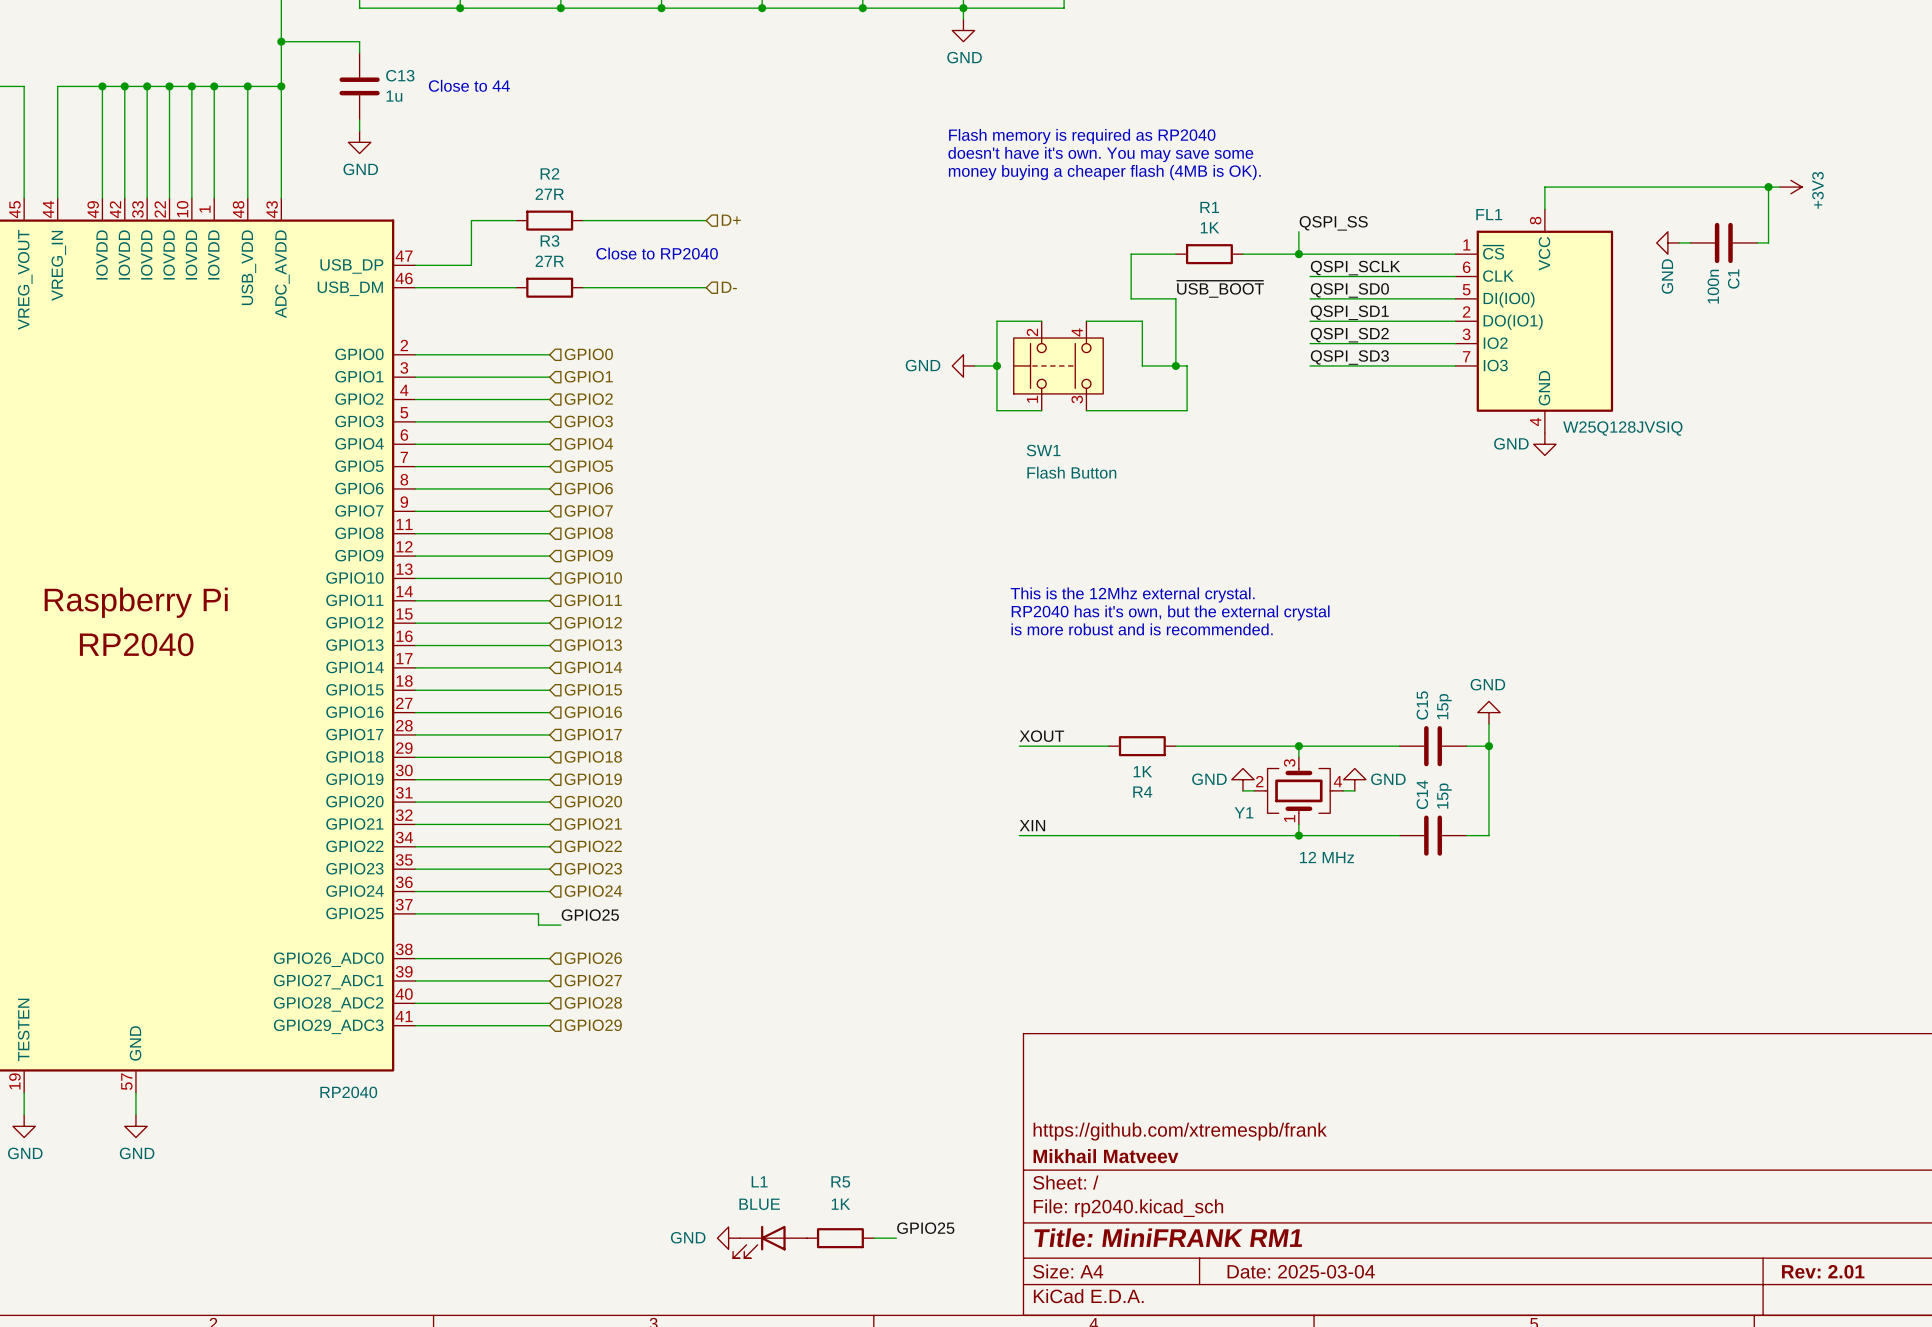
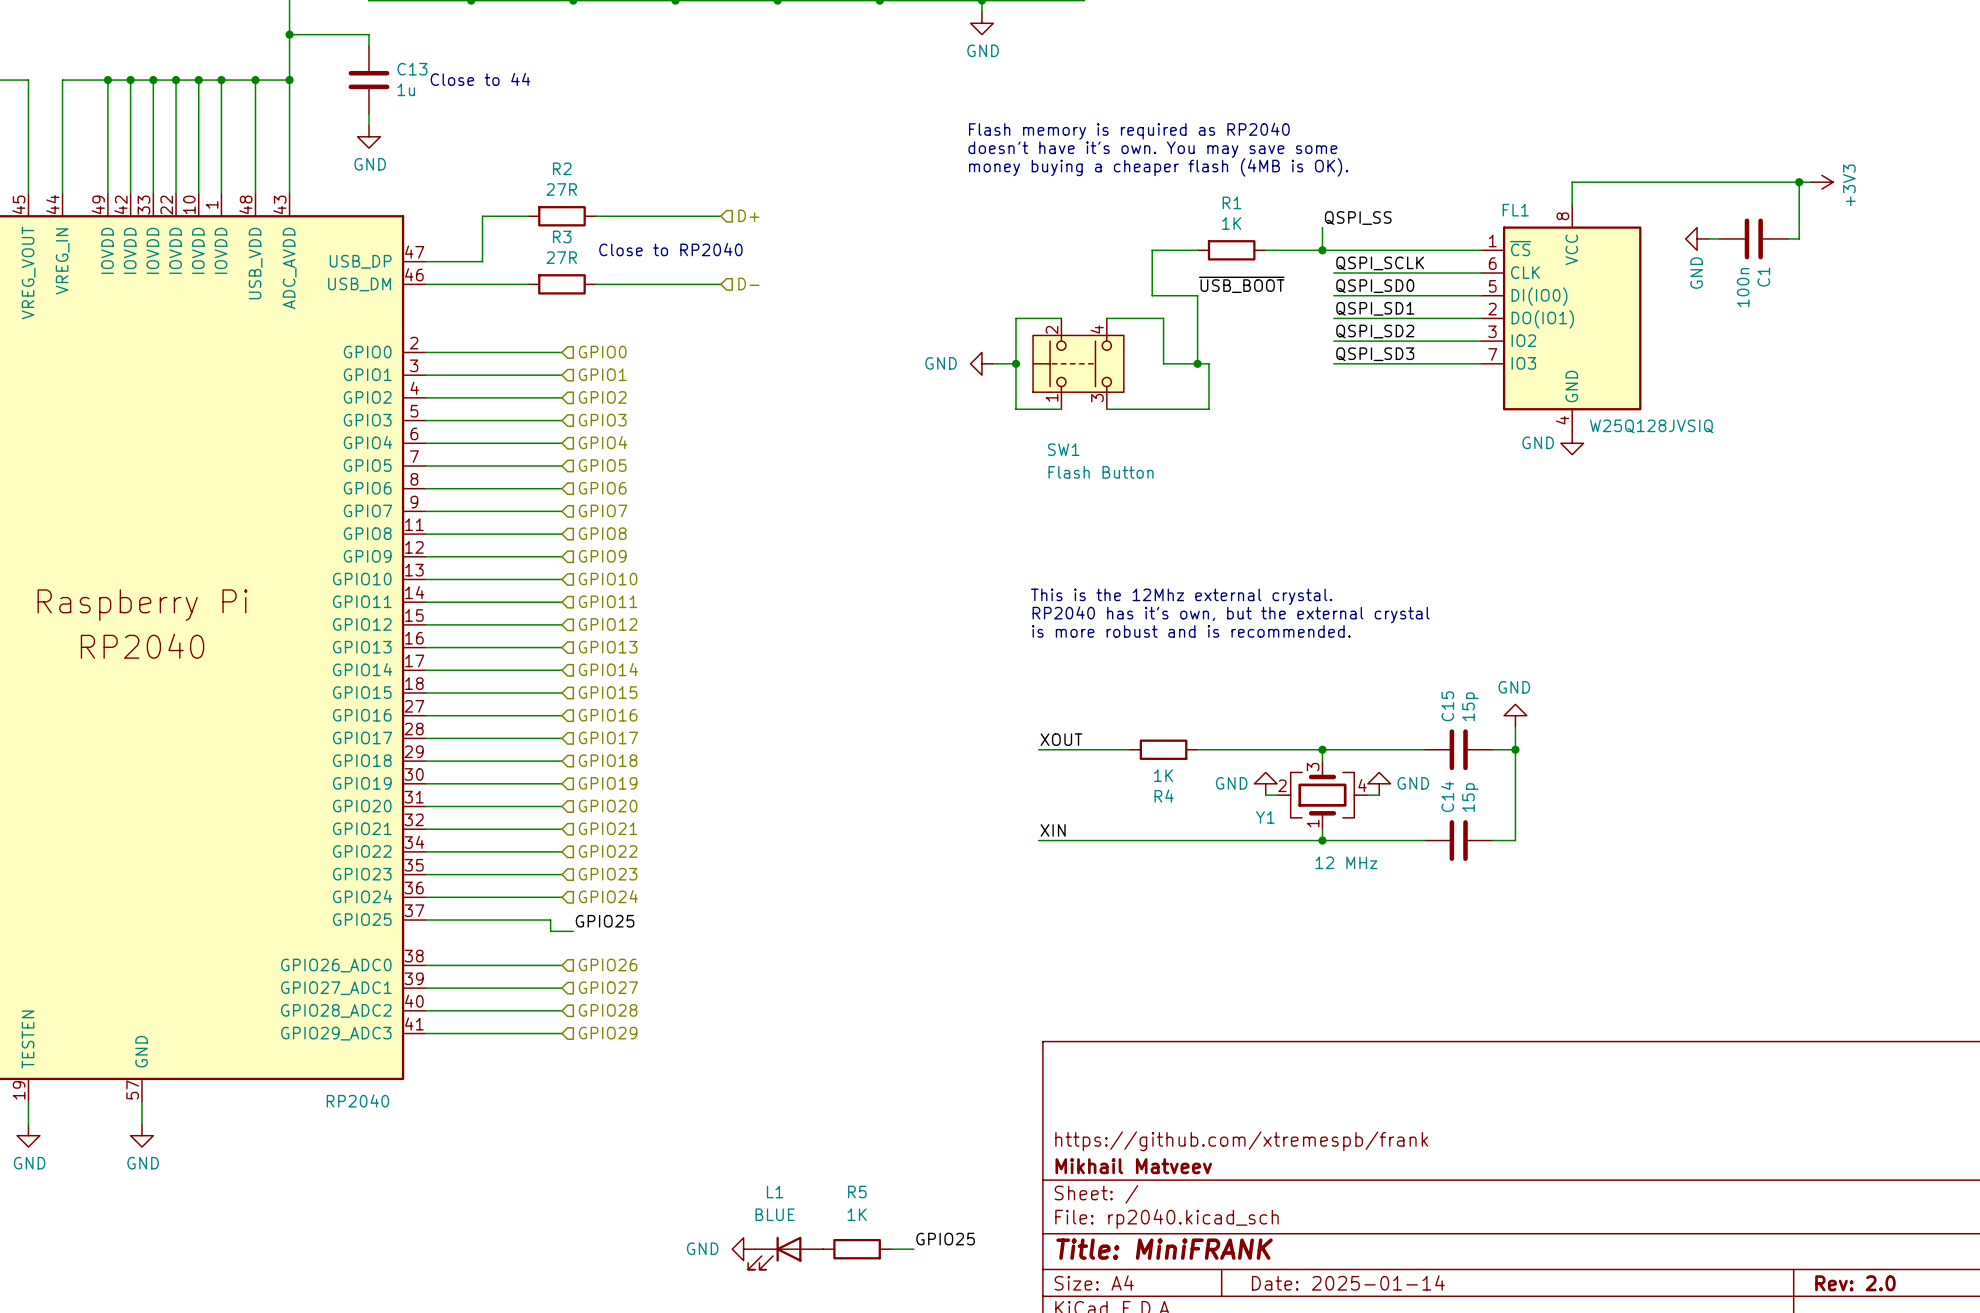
title block: Title: MiniFRANK RM1 (1168, 1237) -> Title: MiniFRANK (1164, 1249)
title block: Date: 2025-03-04 (1301, 1271) -> Date: 2025-01-14 (1348, 1282)
title block: Rev: 2.01 (1823, 1271) -> Rev: 2.0 (1855, 1283)

